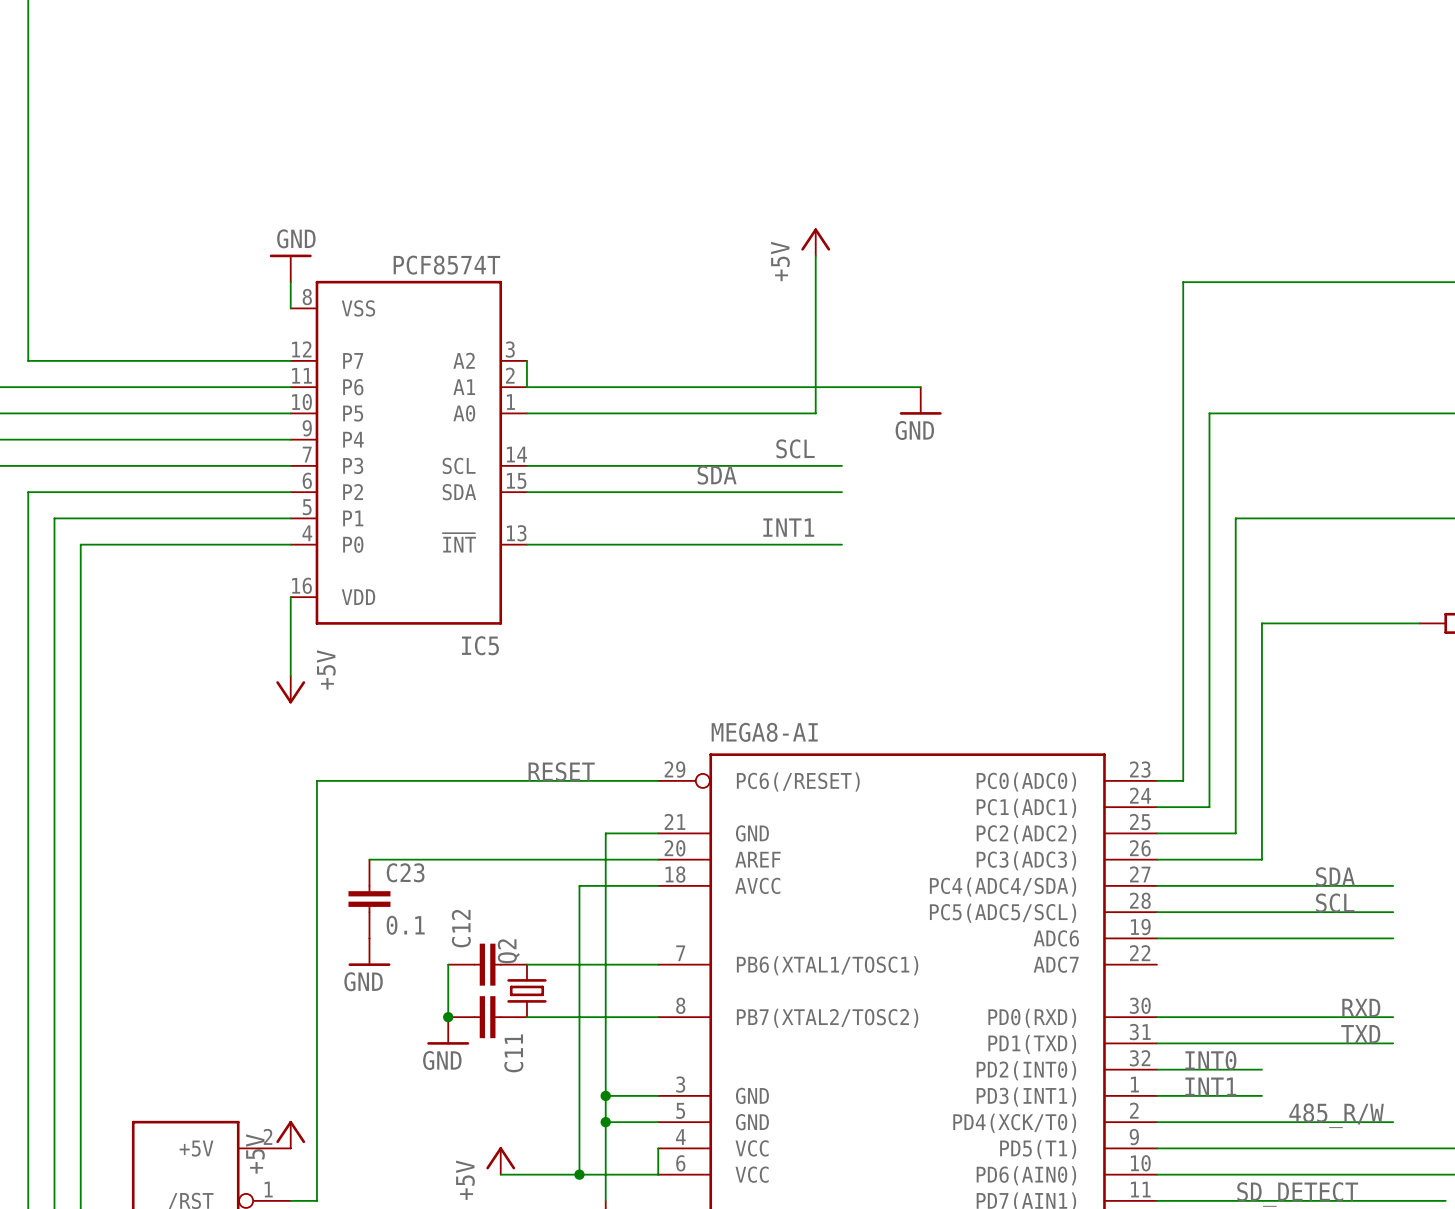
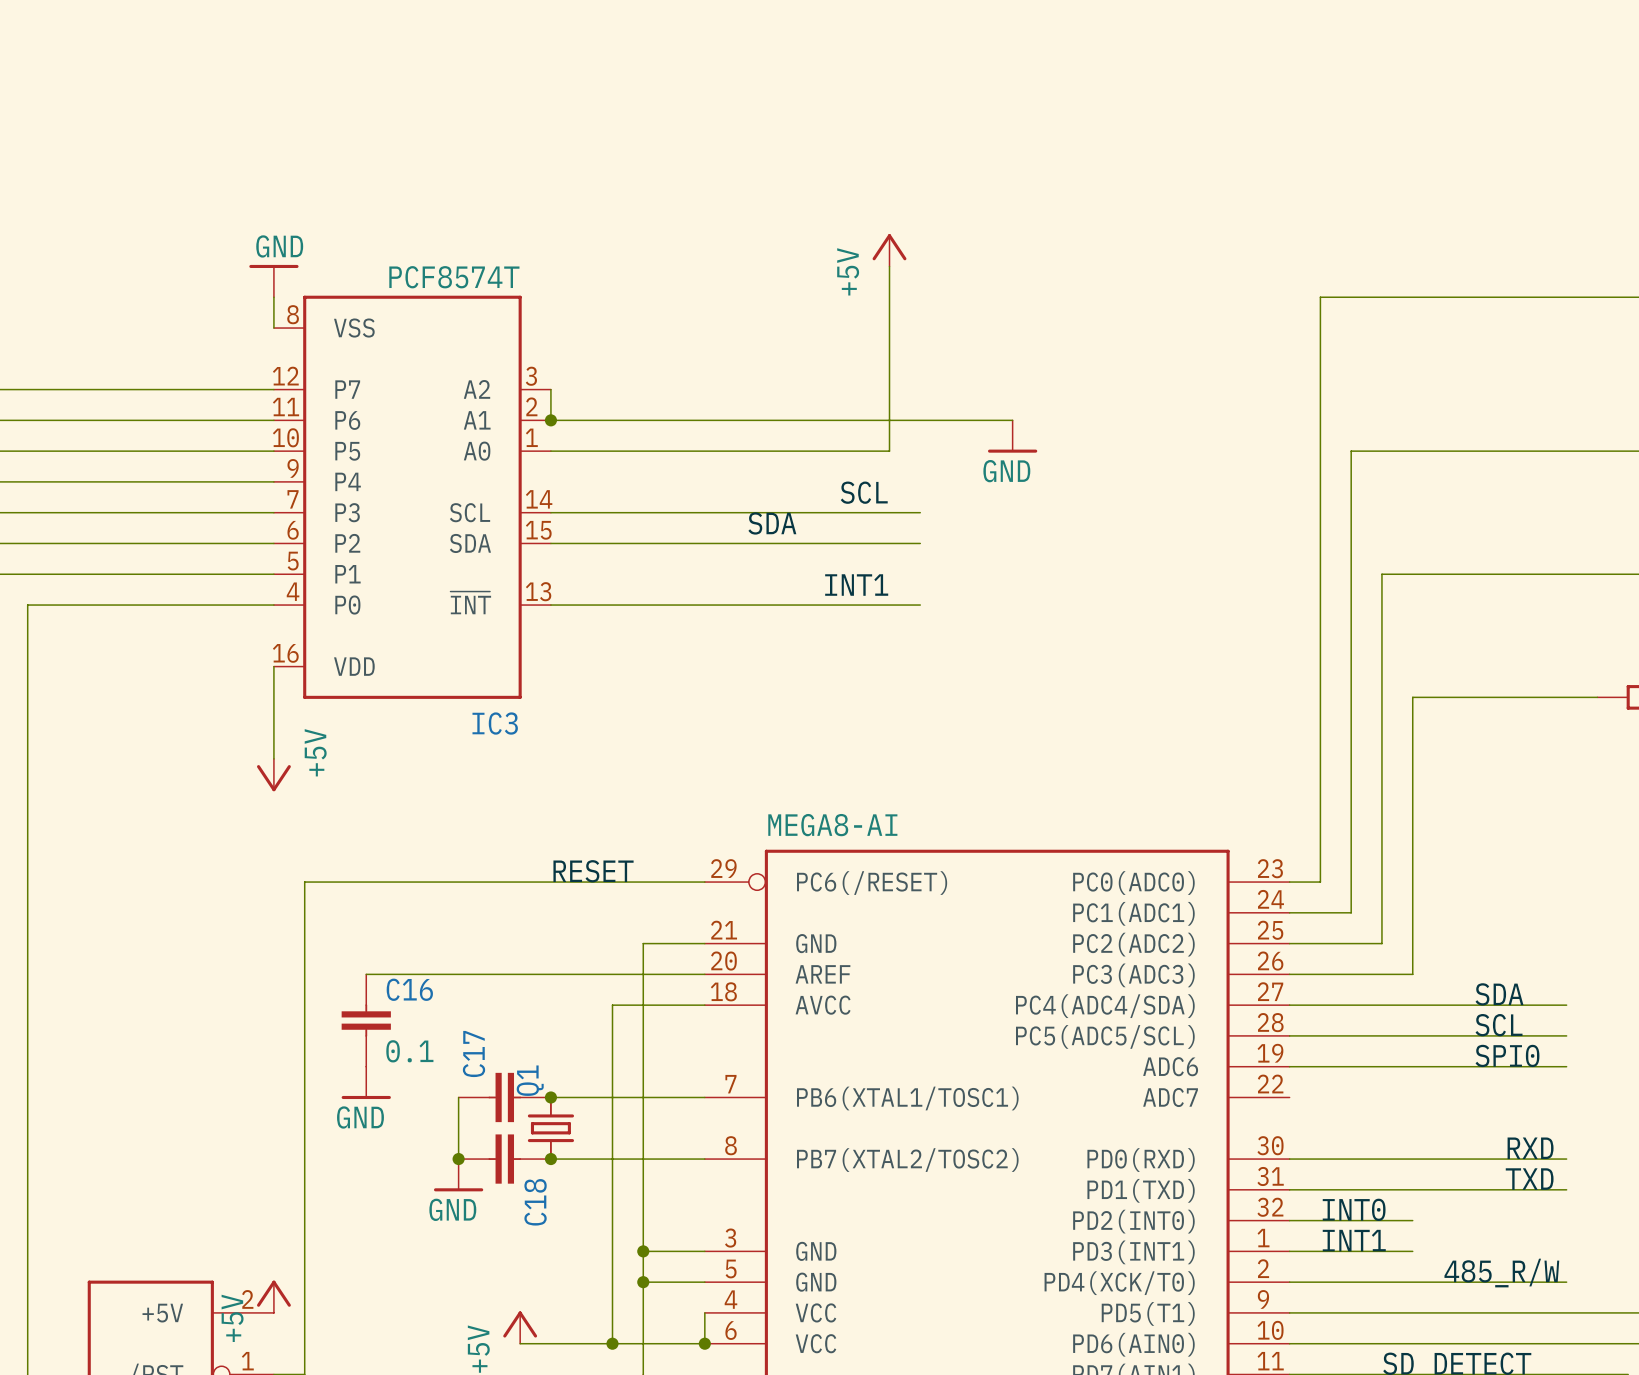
junction: none -> (550, 420)
IC5 name: IC5 (480, 645) -> IC3 (495, 723)
C23 name: C23 (405, 872) -> C16 (409, 989)
C12 name: C12 (461, 928) -> C17 (473, 1054)
label: none -> SPI0 (1507, 1055)
Q2 name: Q2 (508, 951) -> Q1 (530, 1080)
junction: none -> (550, 1097)
junction: none -> (550, 1159)
C11 name: C11 (513, 1053) -> C18 (535, 1202)
junction: none -> (704, 1343)

